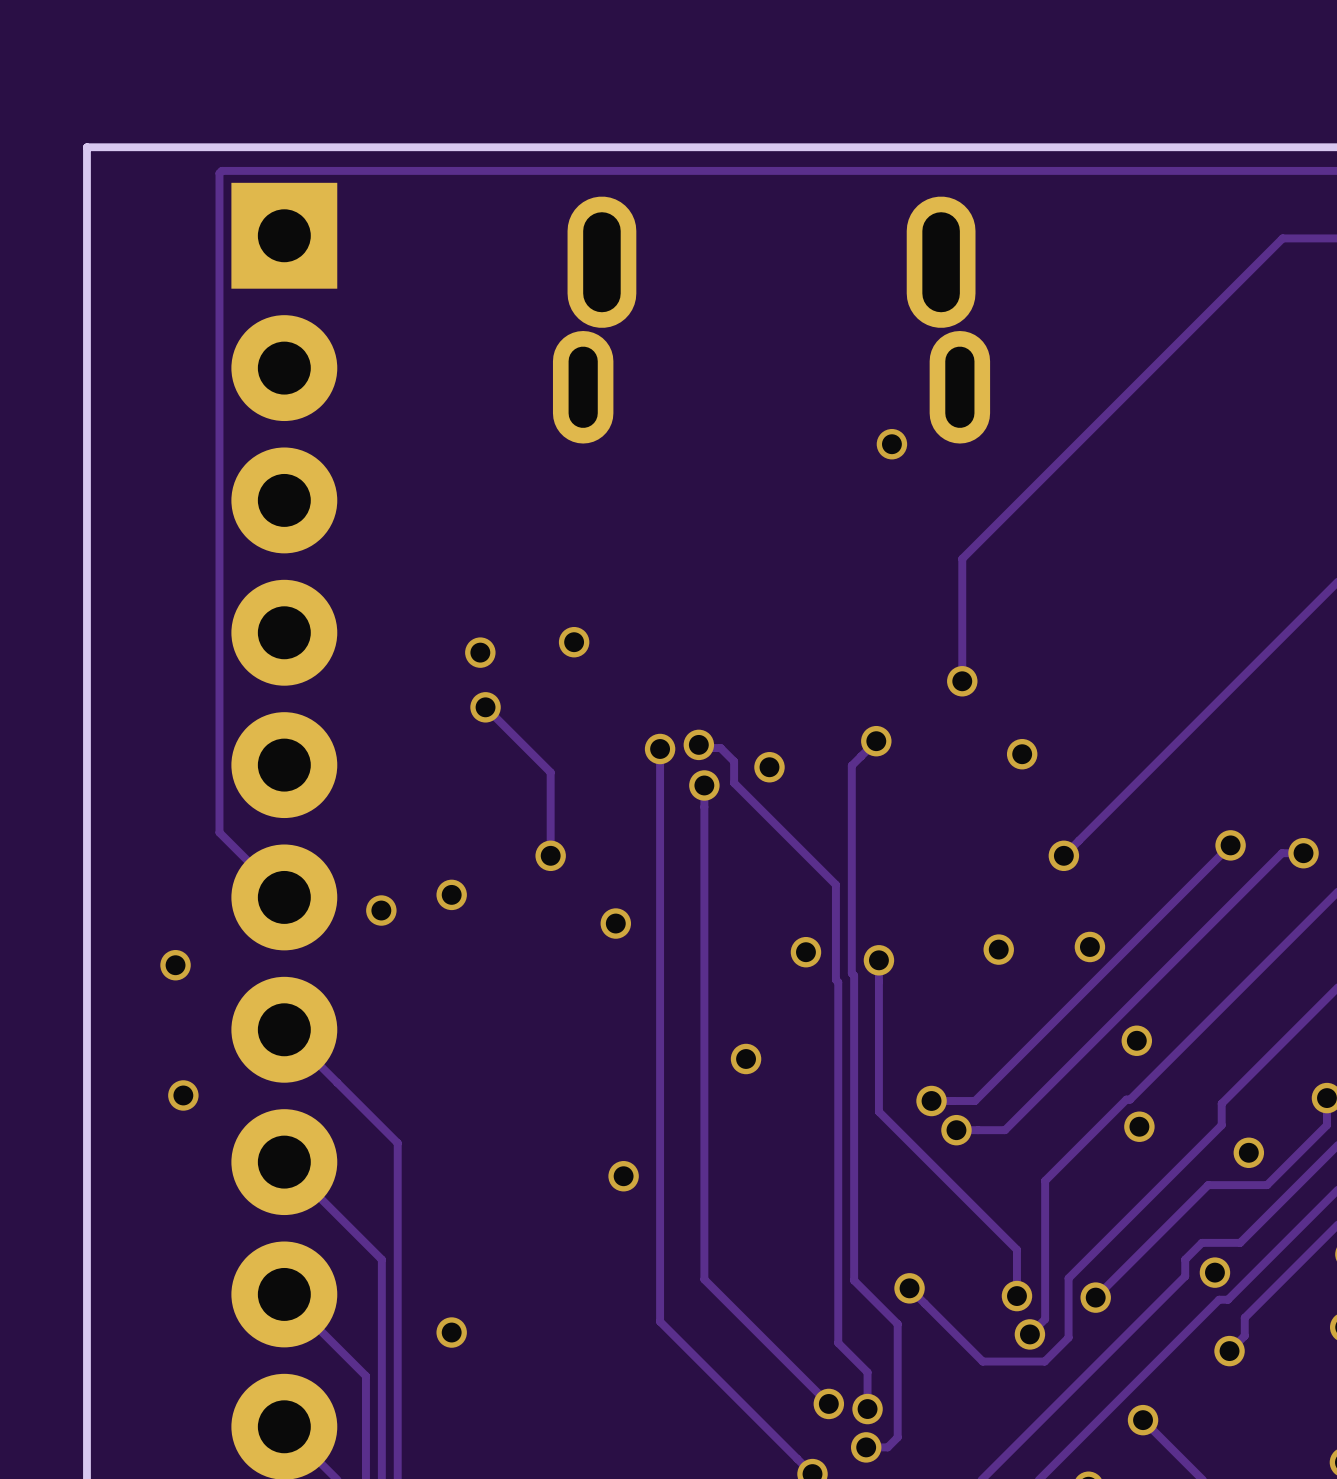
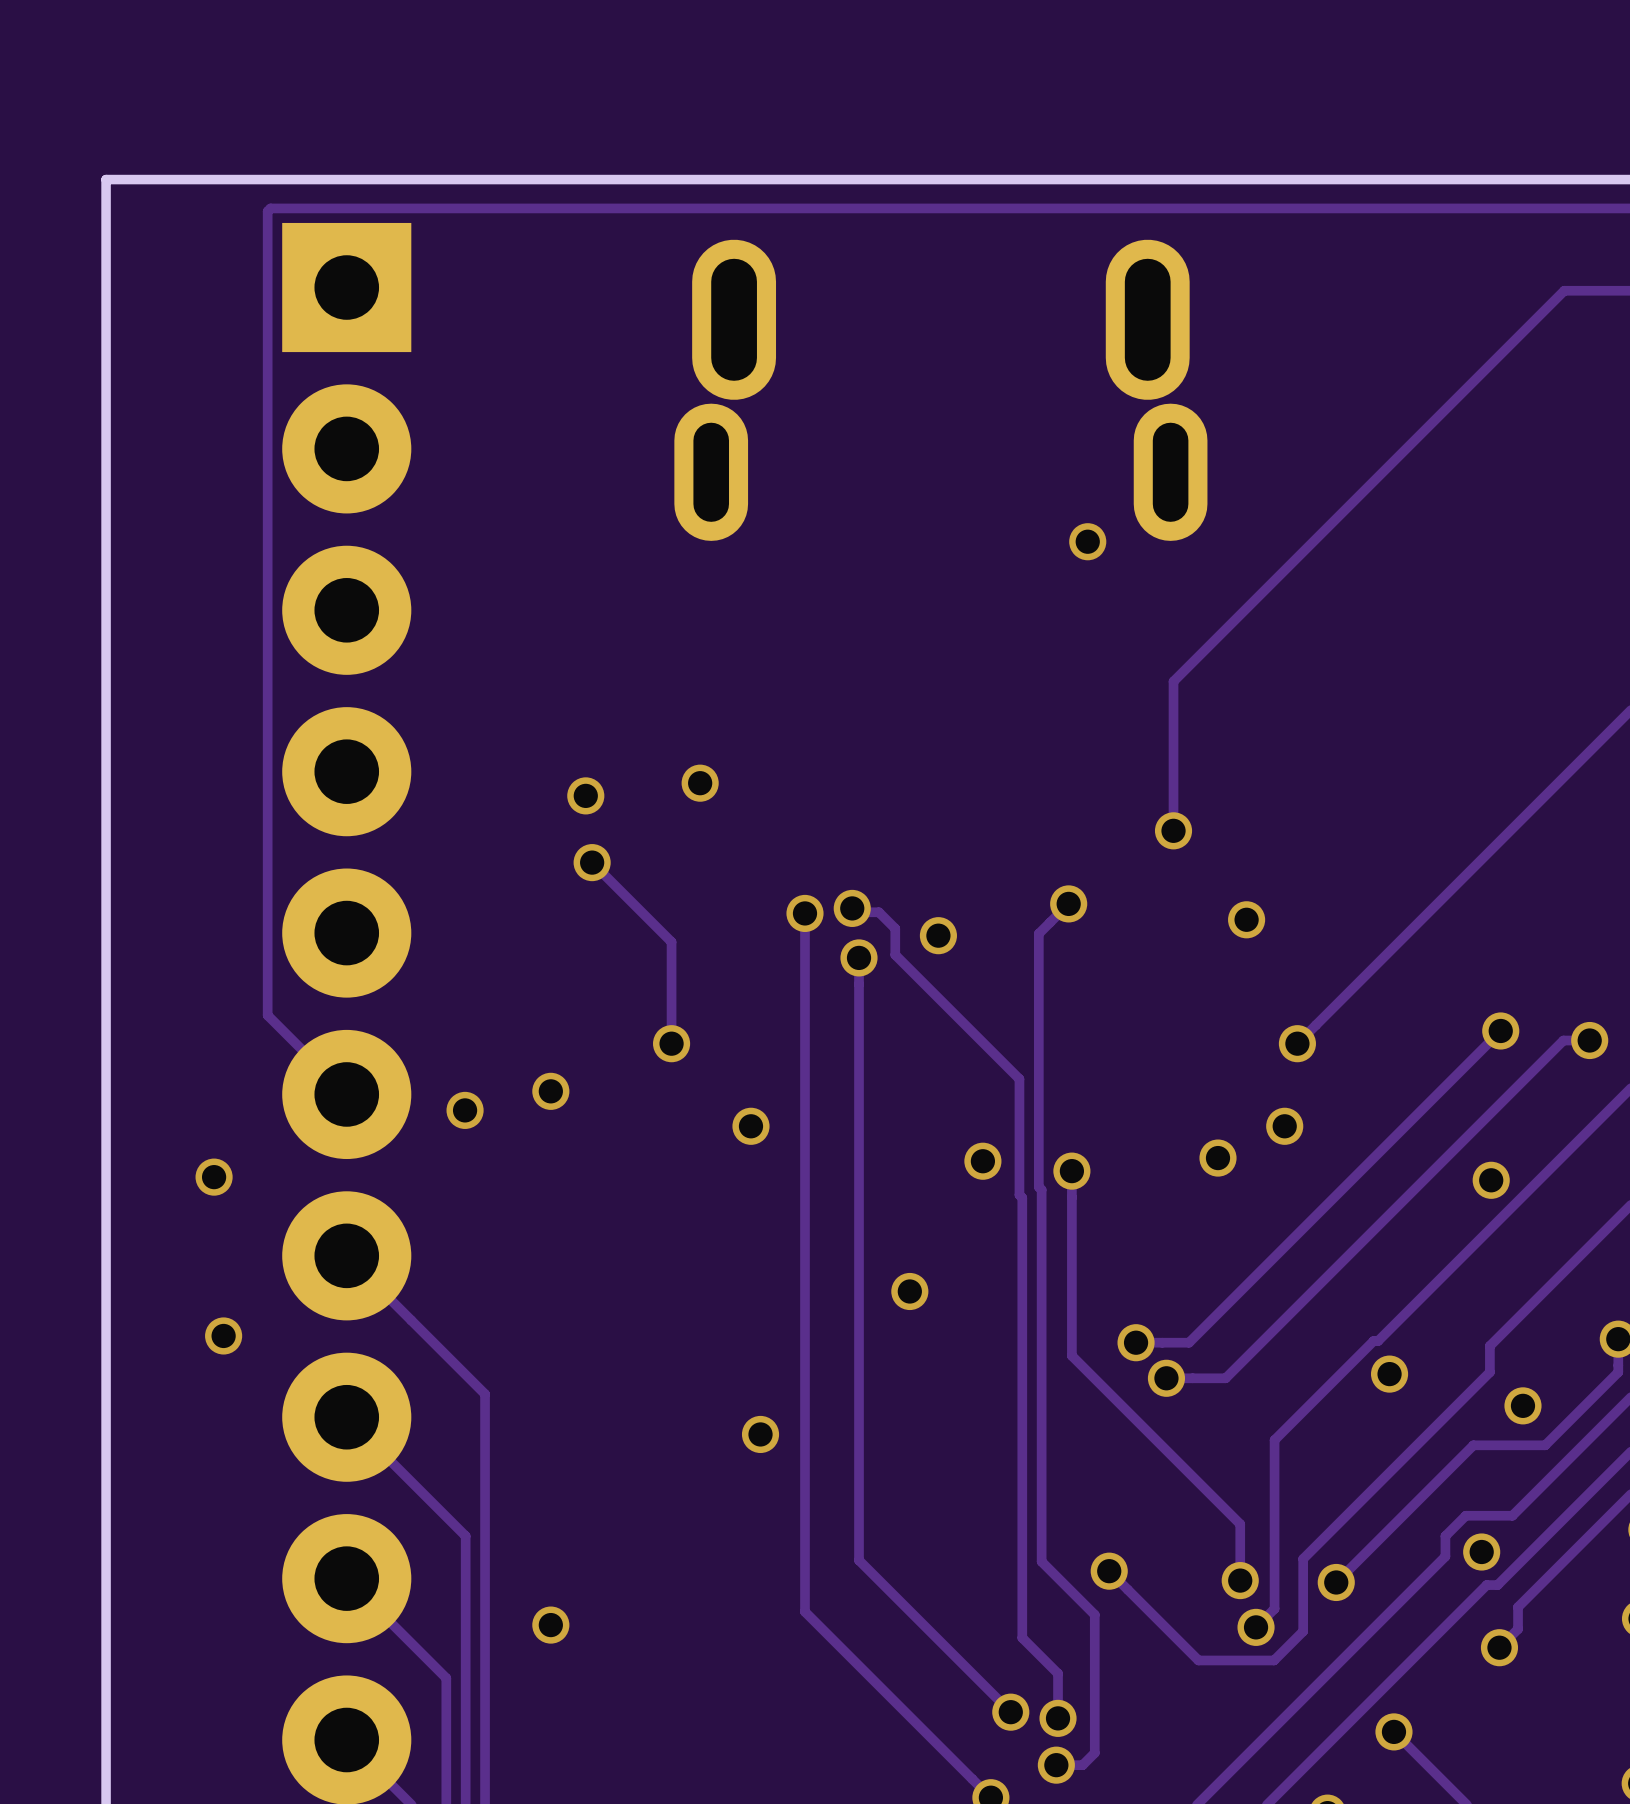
via position: (1089, 946) -> (1284, 1126)
via: none -> (1491, 1180)
via: (1136, 1040) -> none

